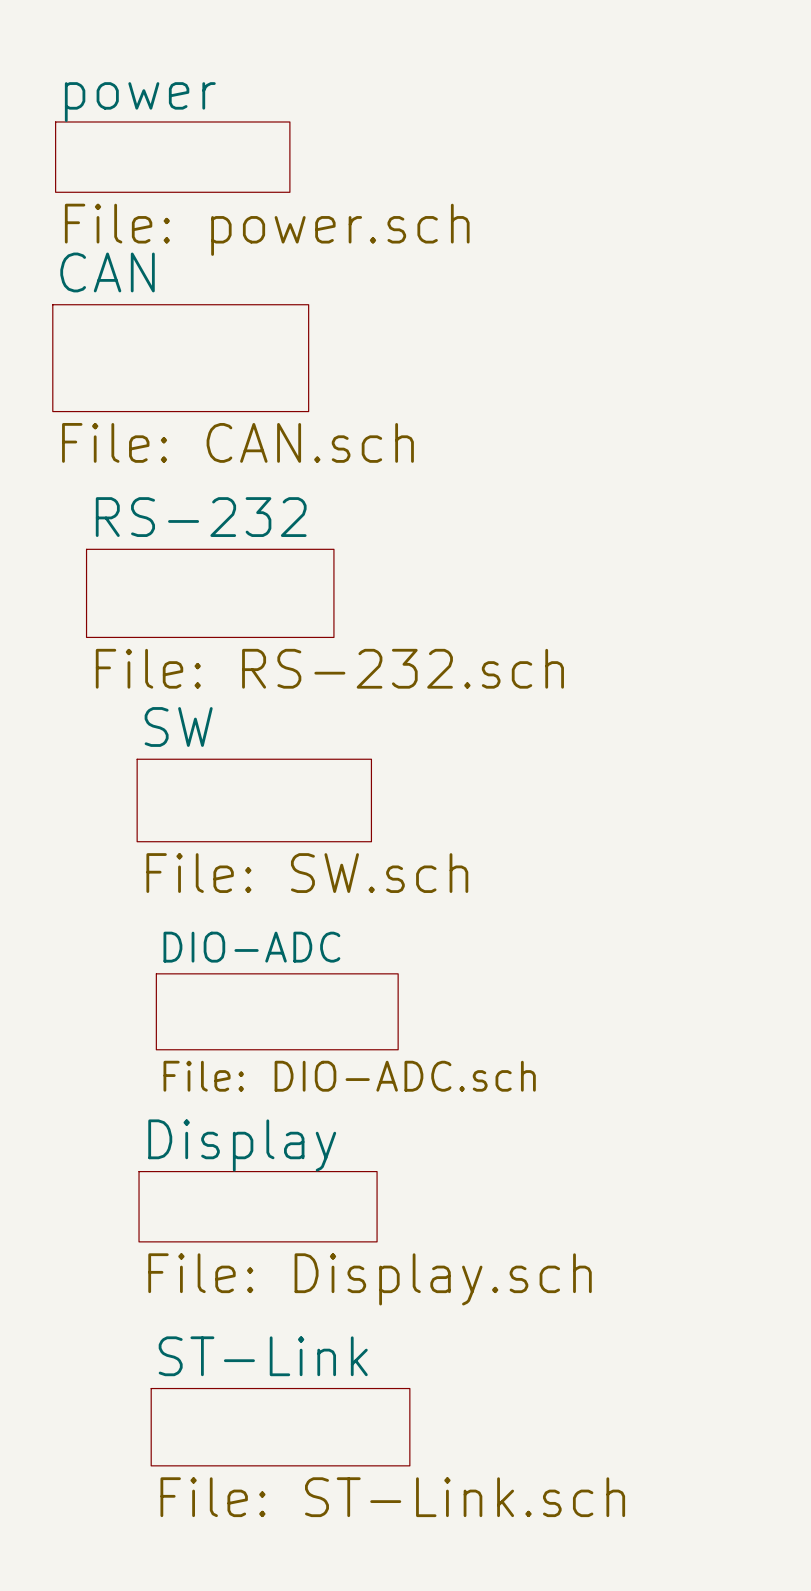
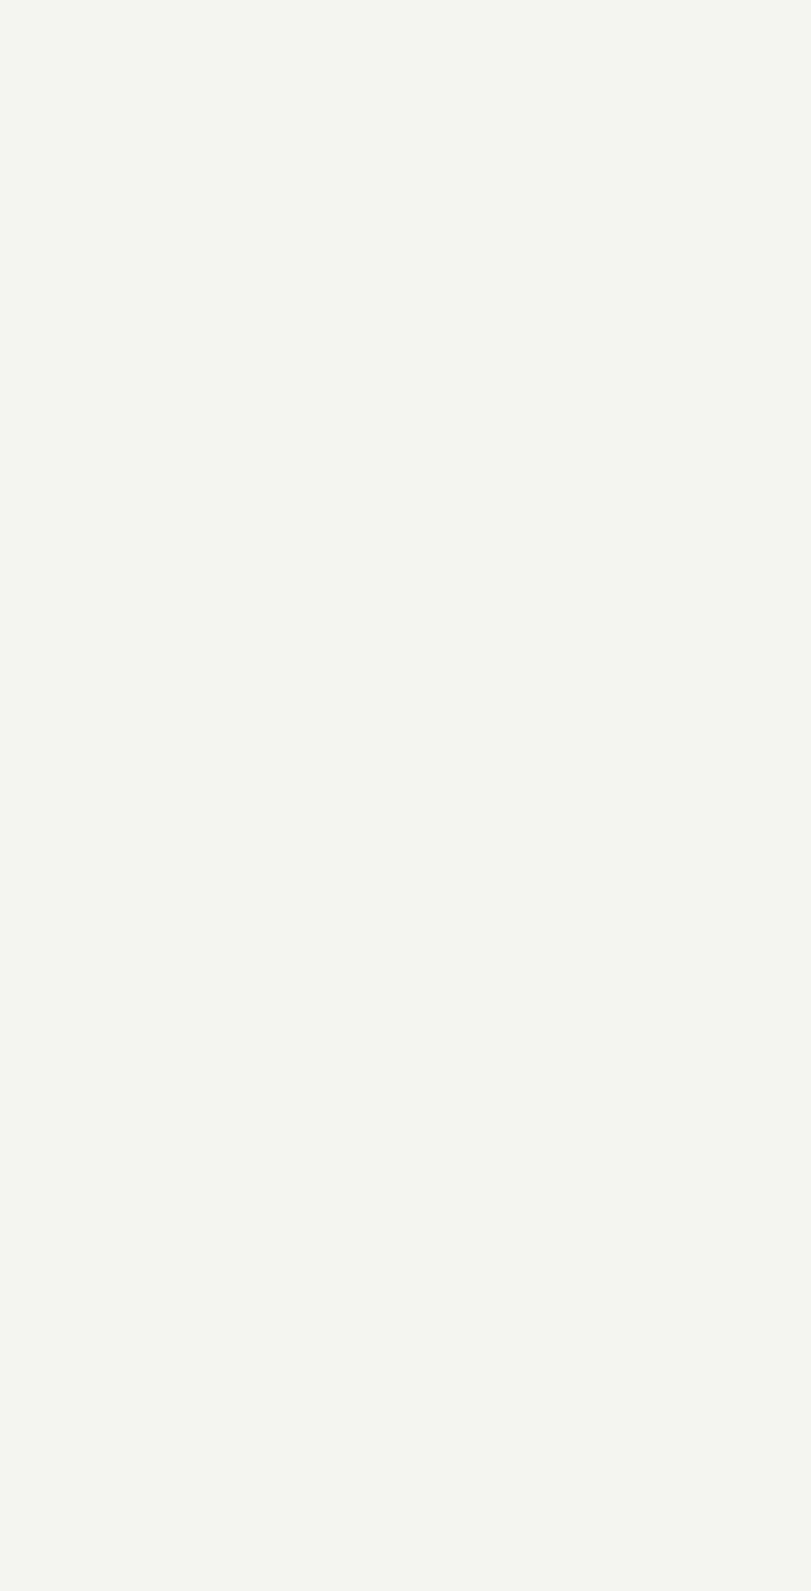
sheet power: File: power.sch (172, 157) -> none
sheet CAN: File: CAN.sch (180, 358) -> none
sheet RS-232: File: RS-232.sch (210, 593) -> none
sheet SW: File: SW.sch (254, 800) -> none
sheet DIO-ADC: File: DIO-ADC.sch (277, 1011) -> none
sheet Display: File: Display.sch (258, 1206) -> none
sheet ST-Link: File: ST-Link.sch (280, 1427) -> none

